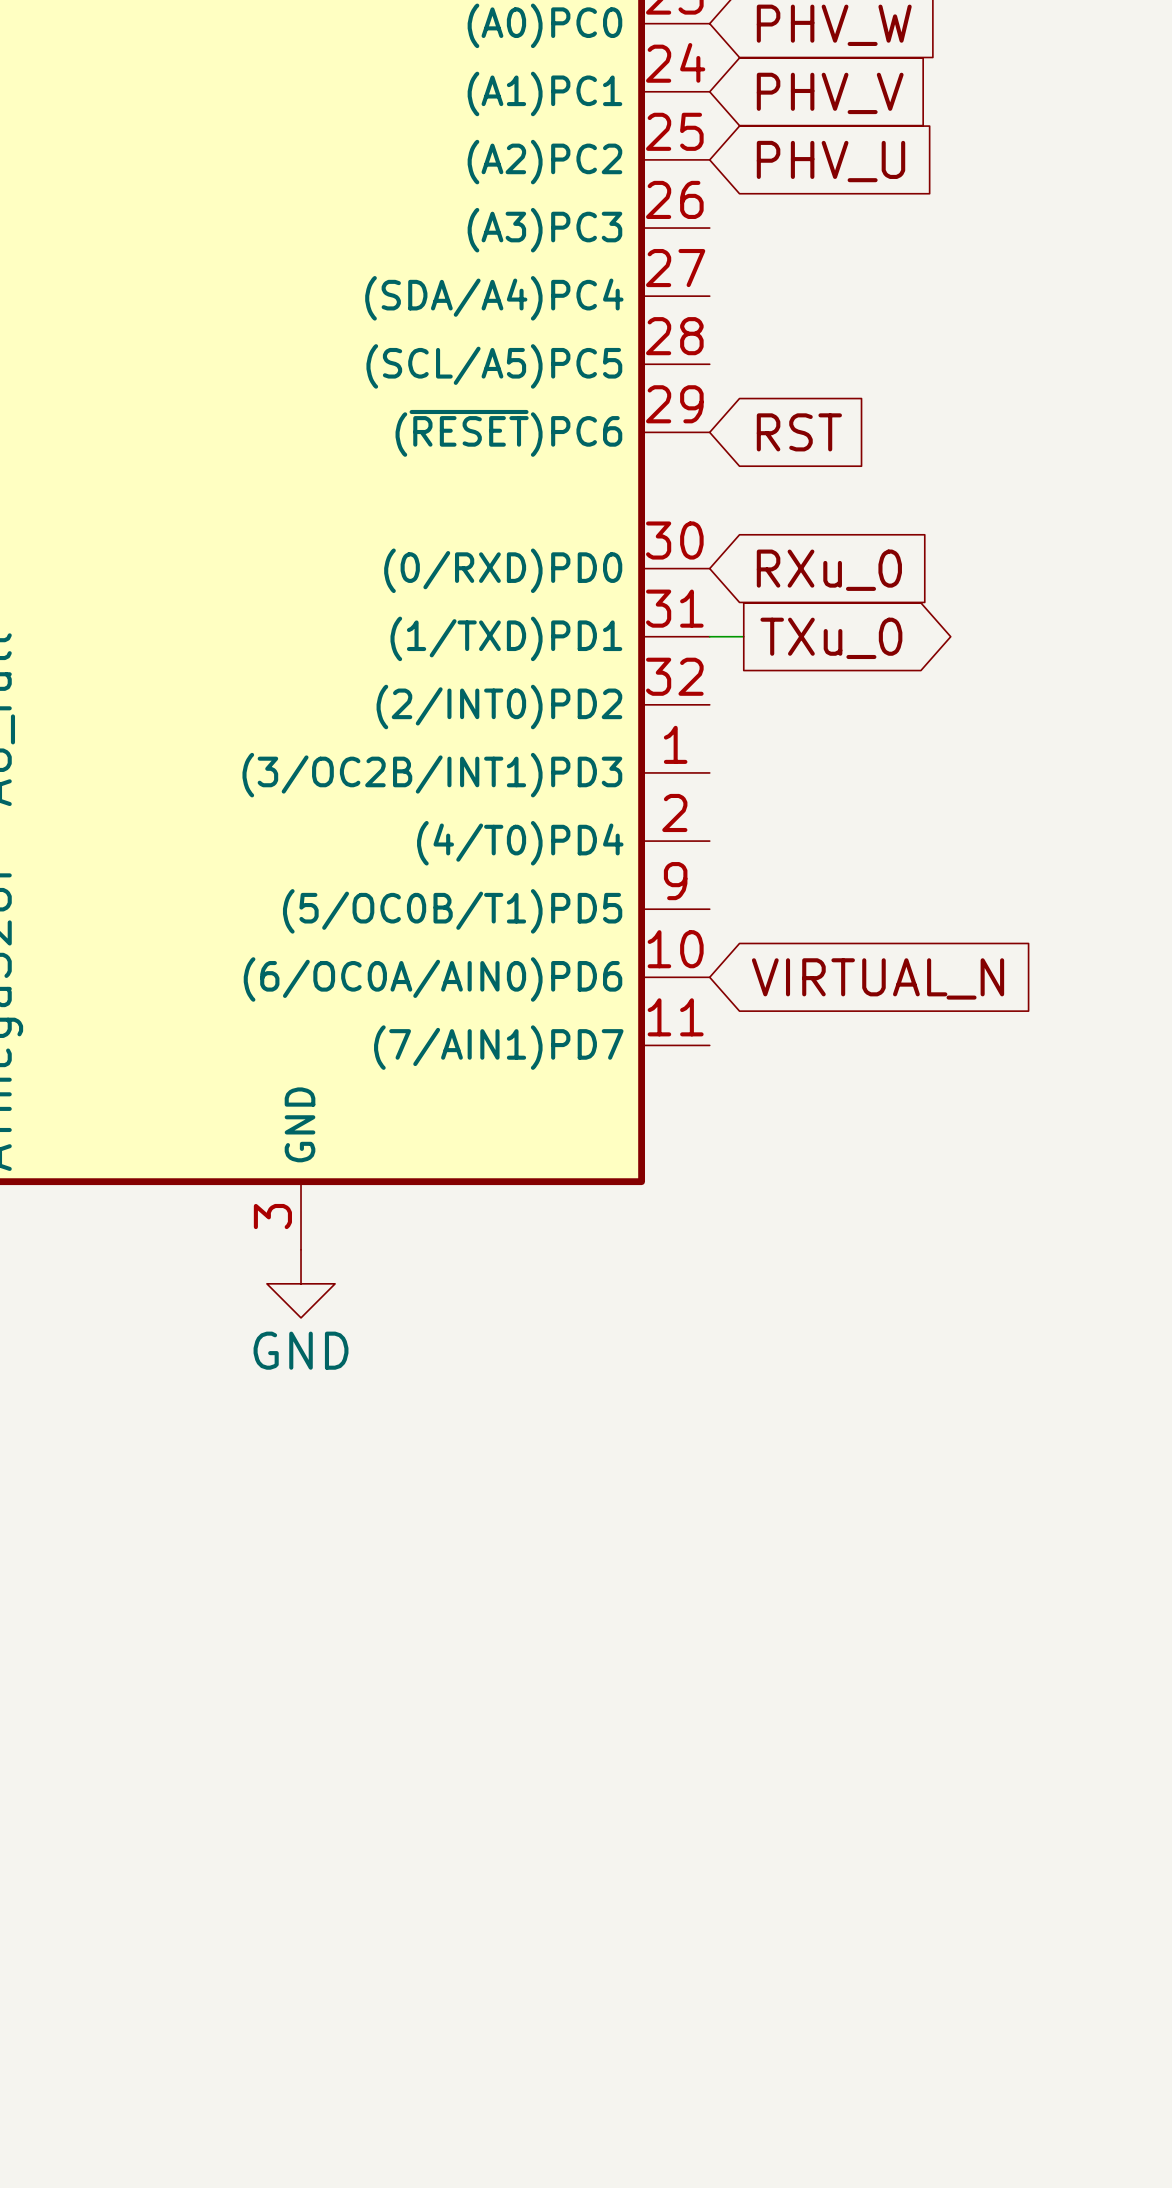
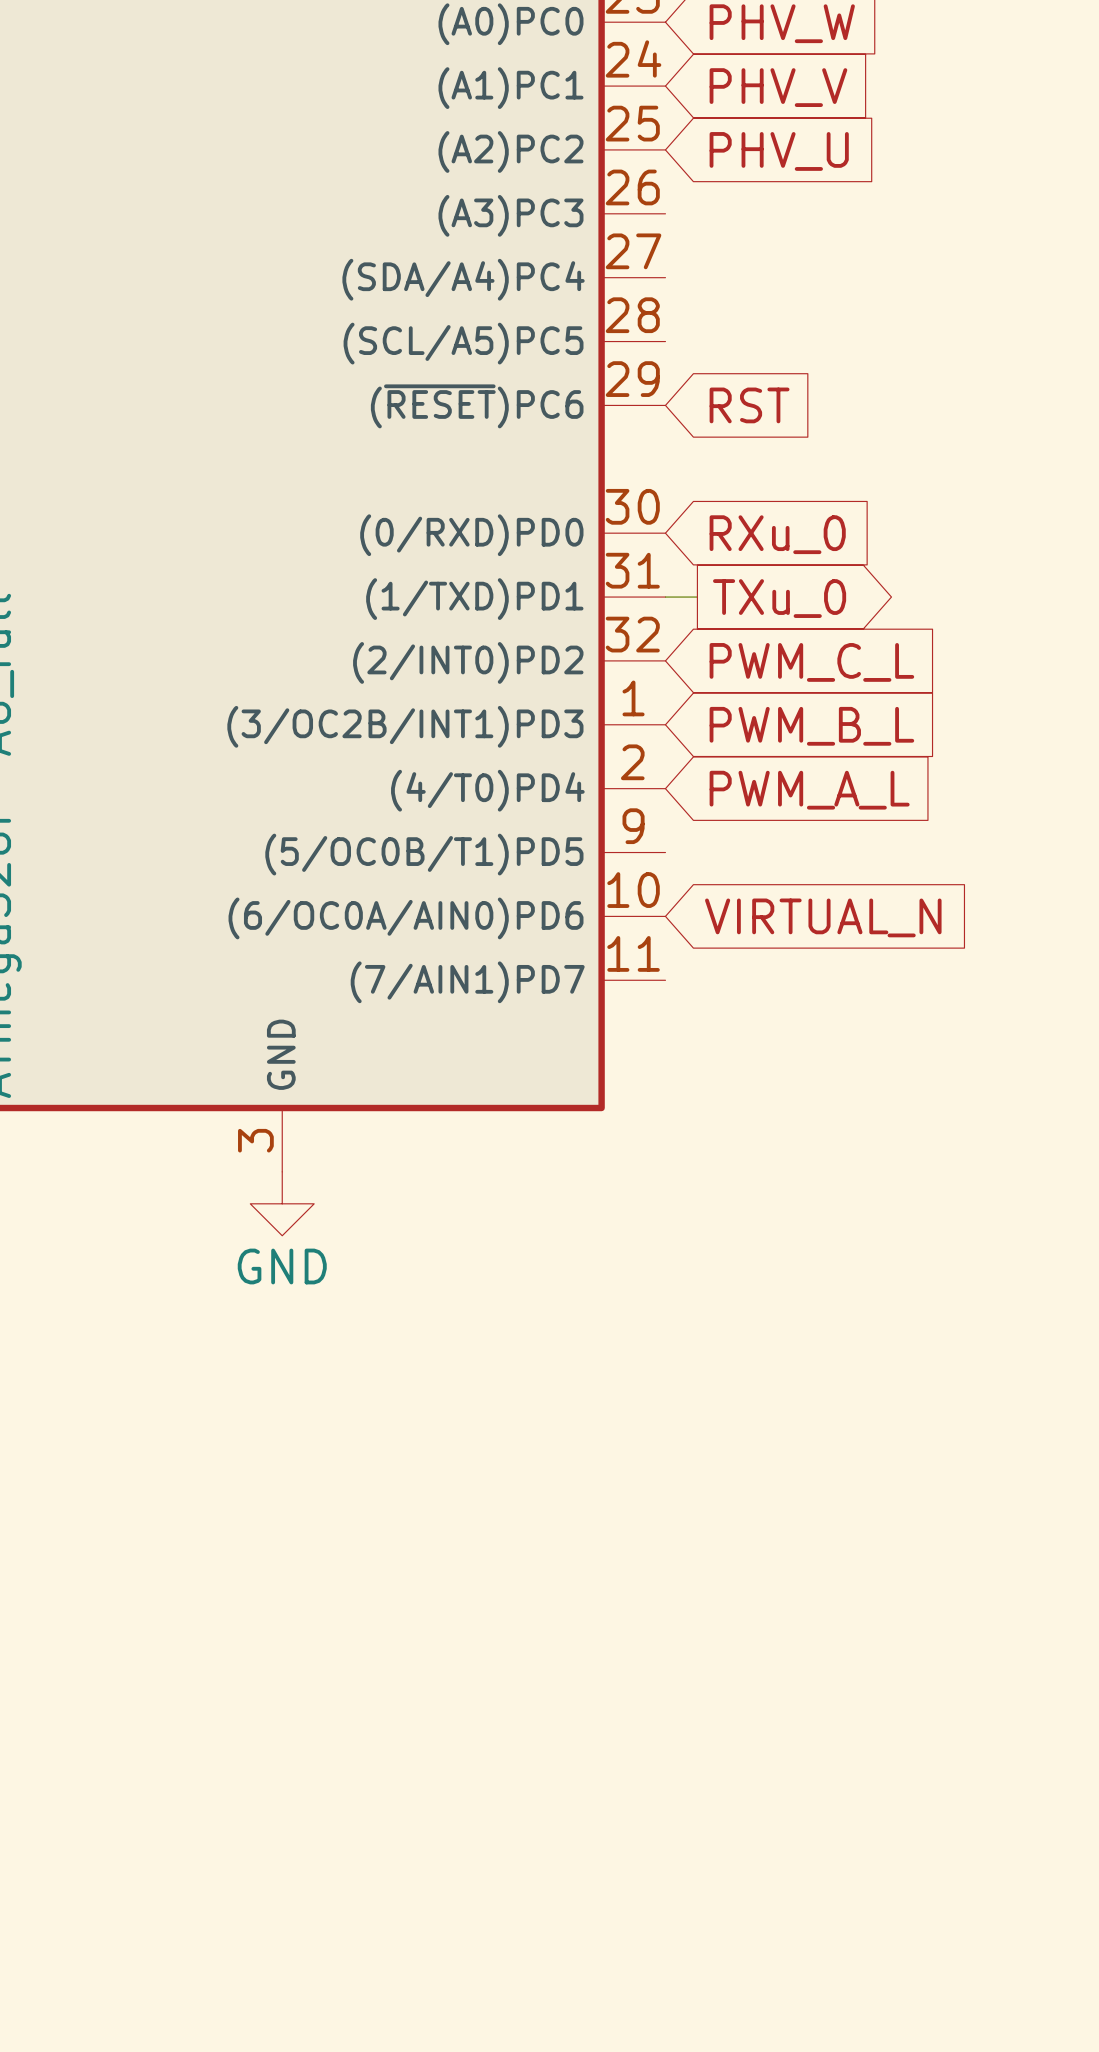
global label: none -> PWM_C_L (811, 662)
global label: none -> PWM_B_L (811, 726)
global label: none -> PWM_A_L (809, 790)

